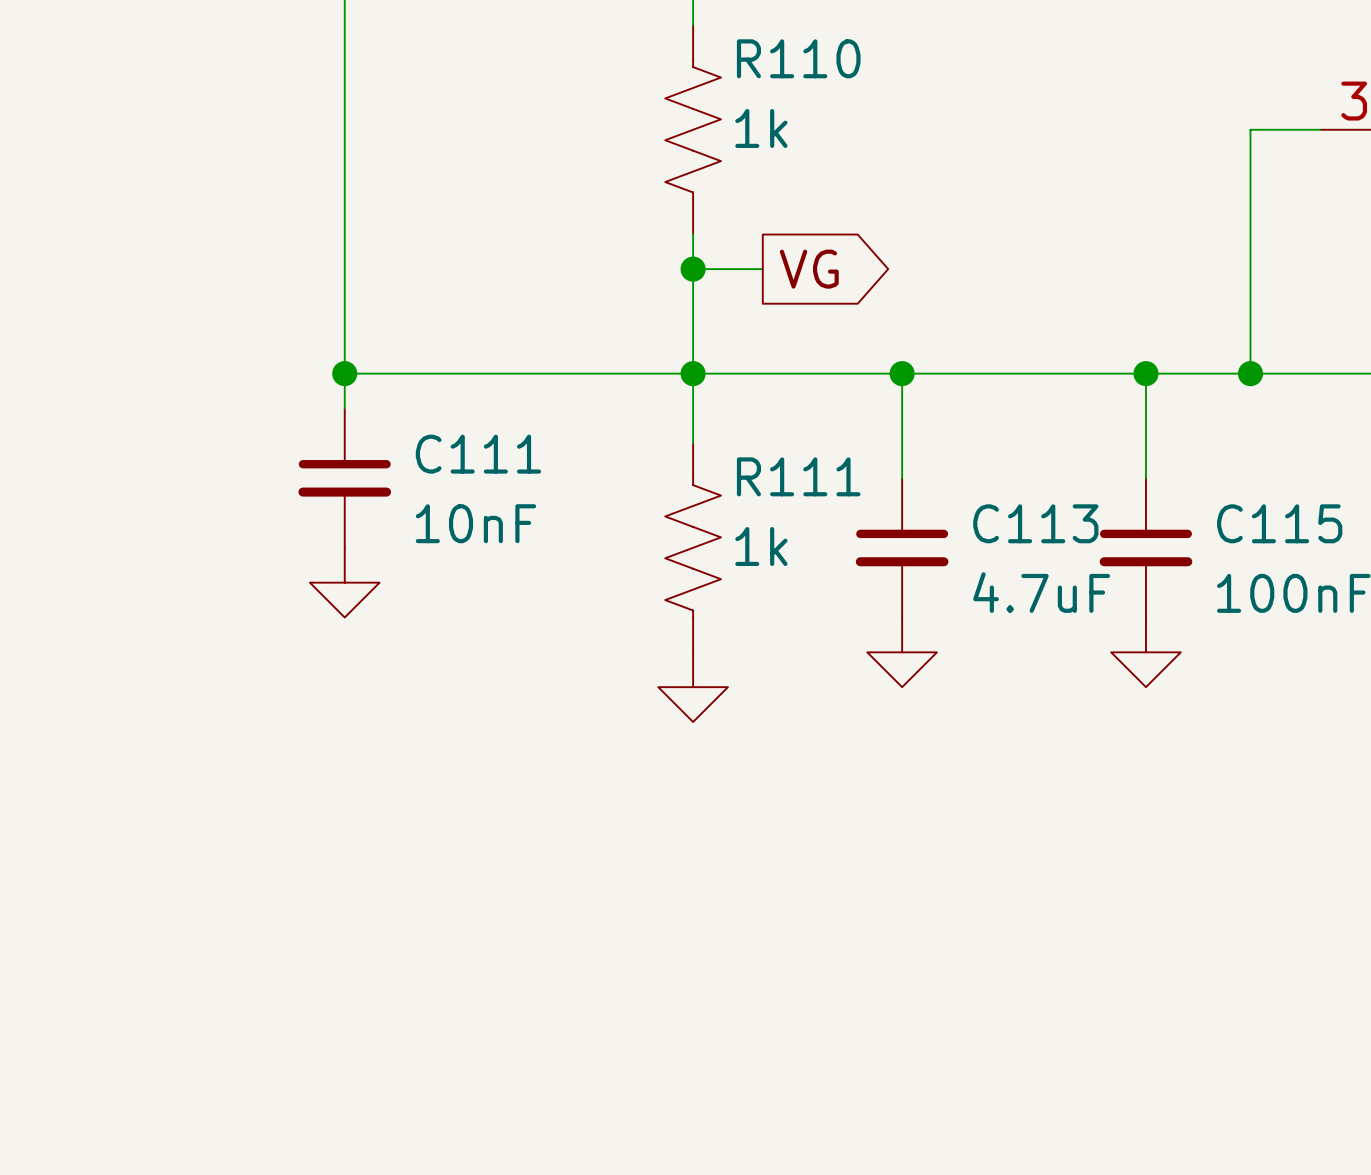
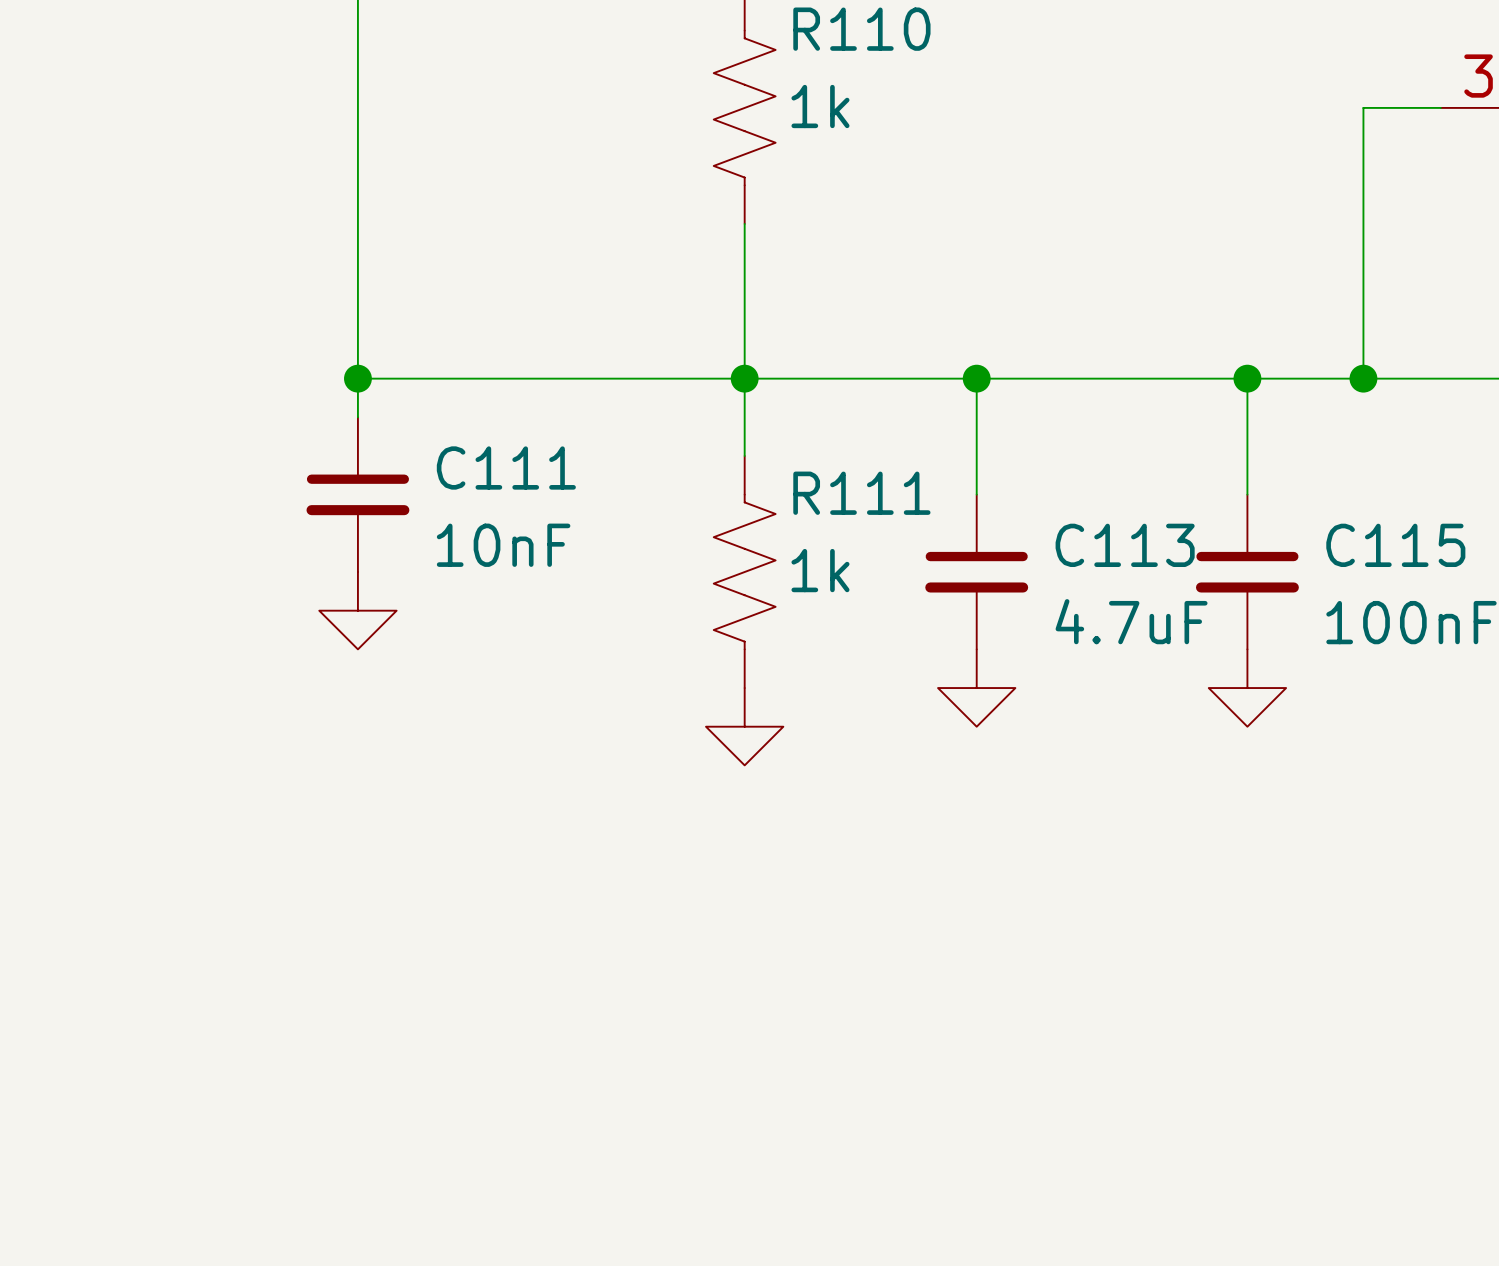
wire: (693, 269) (762, 269) -> none
junction: (693, 269) -> none
global label: VG (809, 269) -> none

